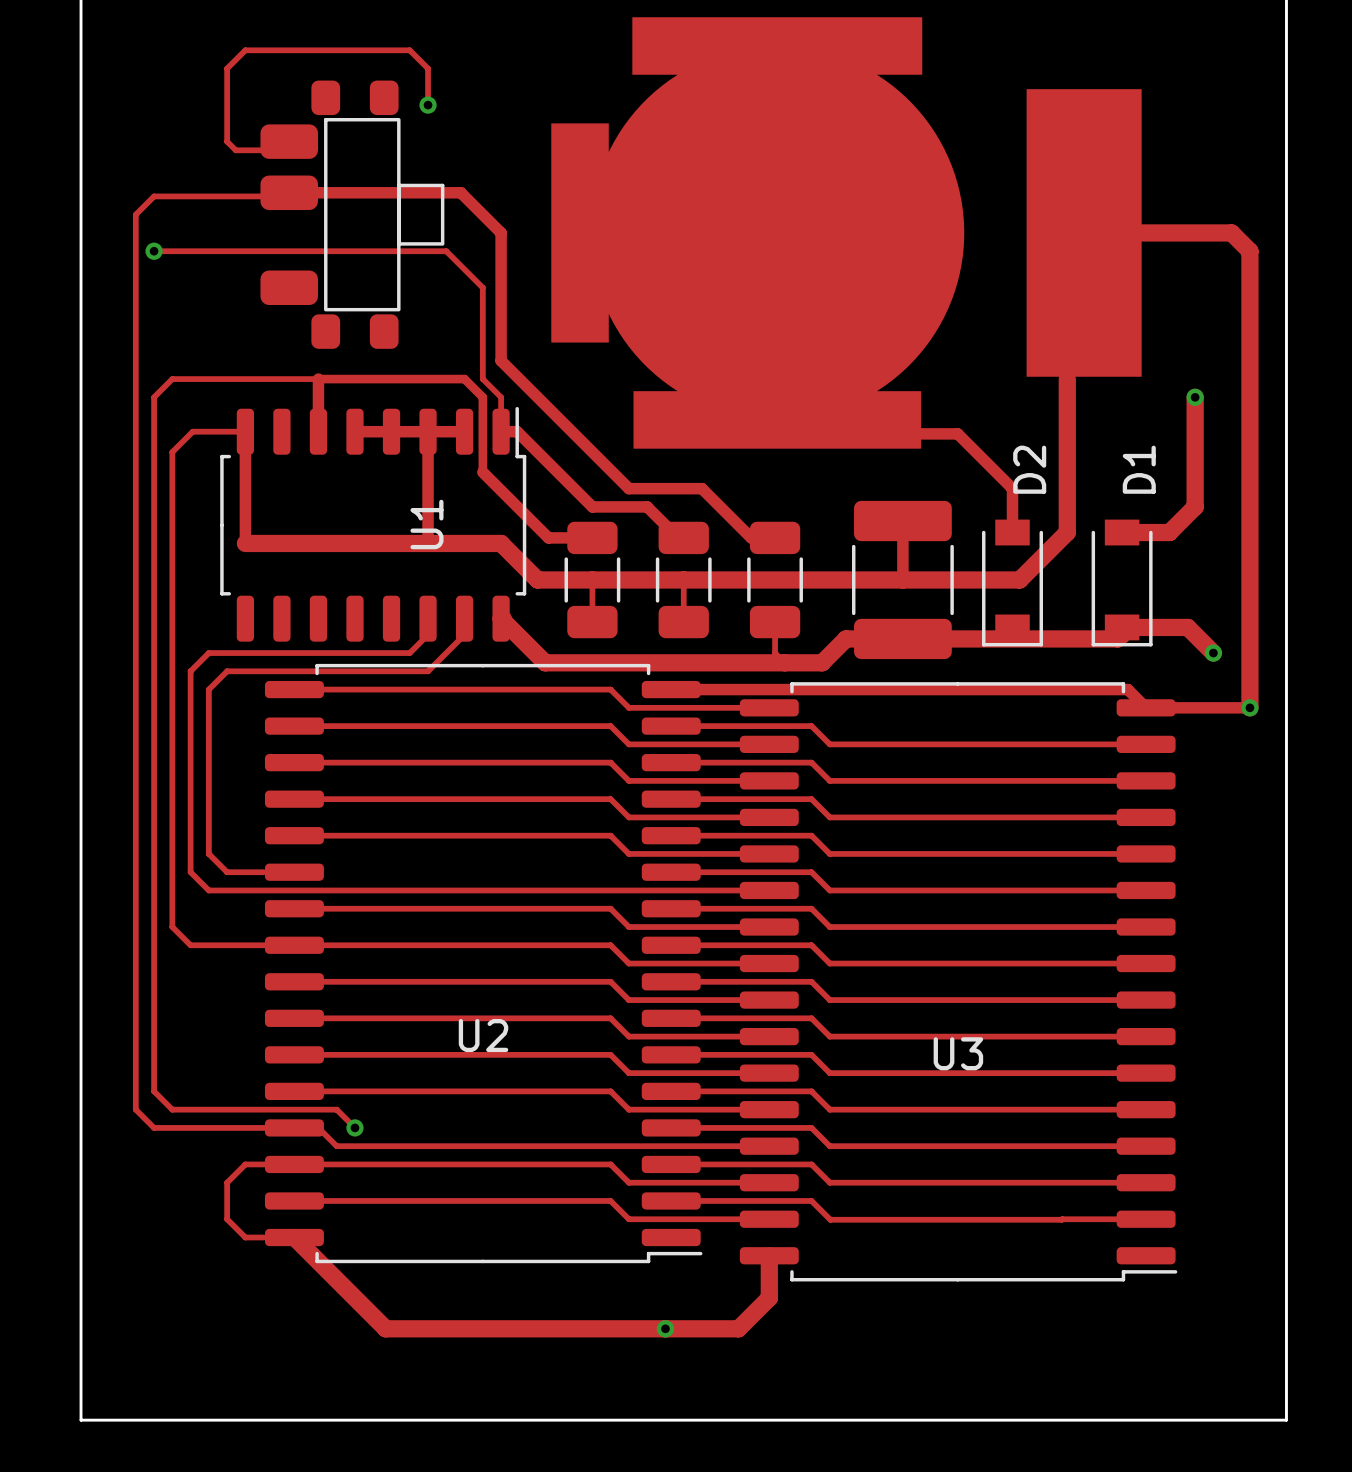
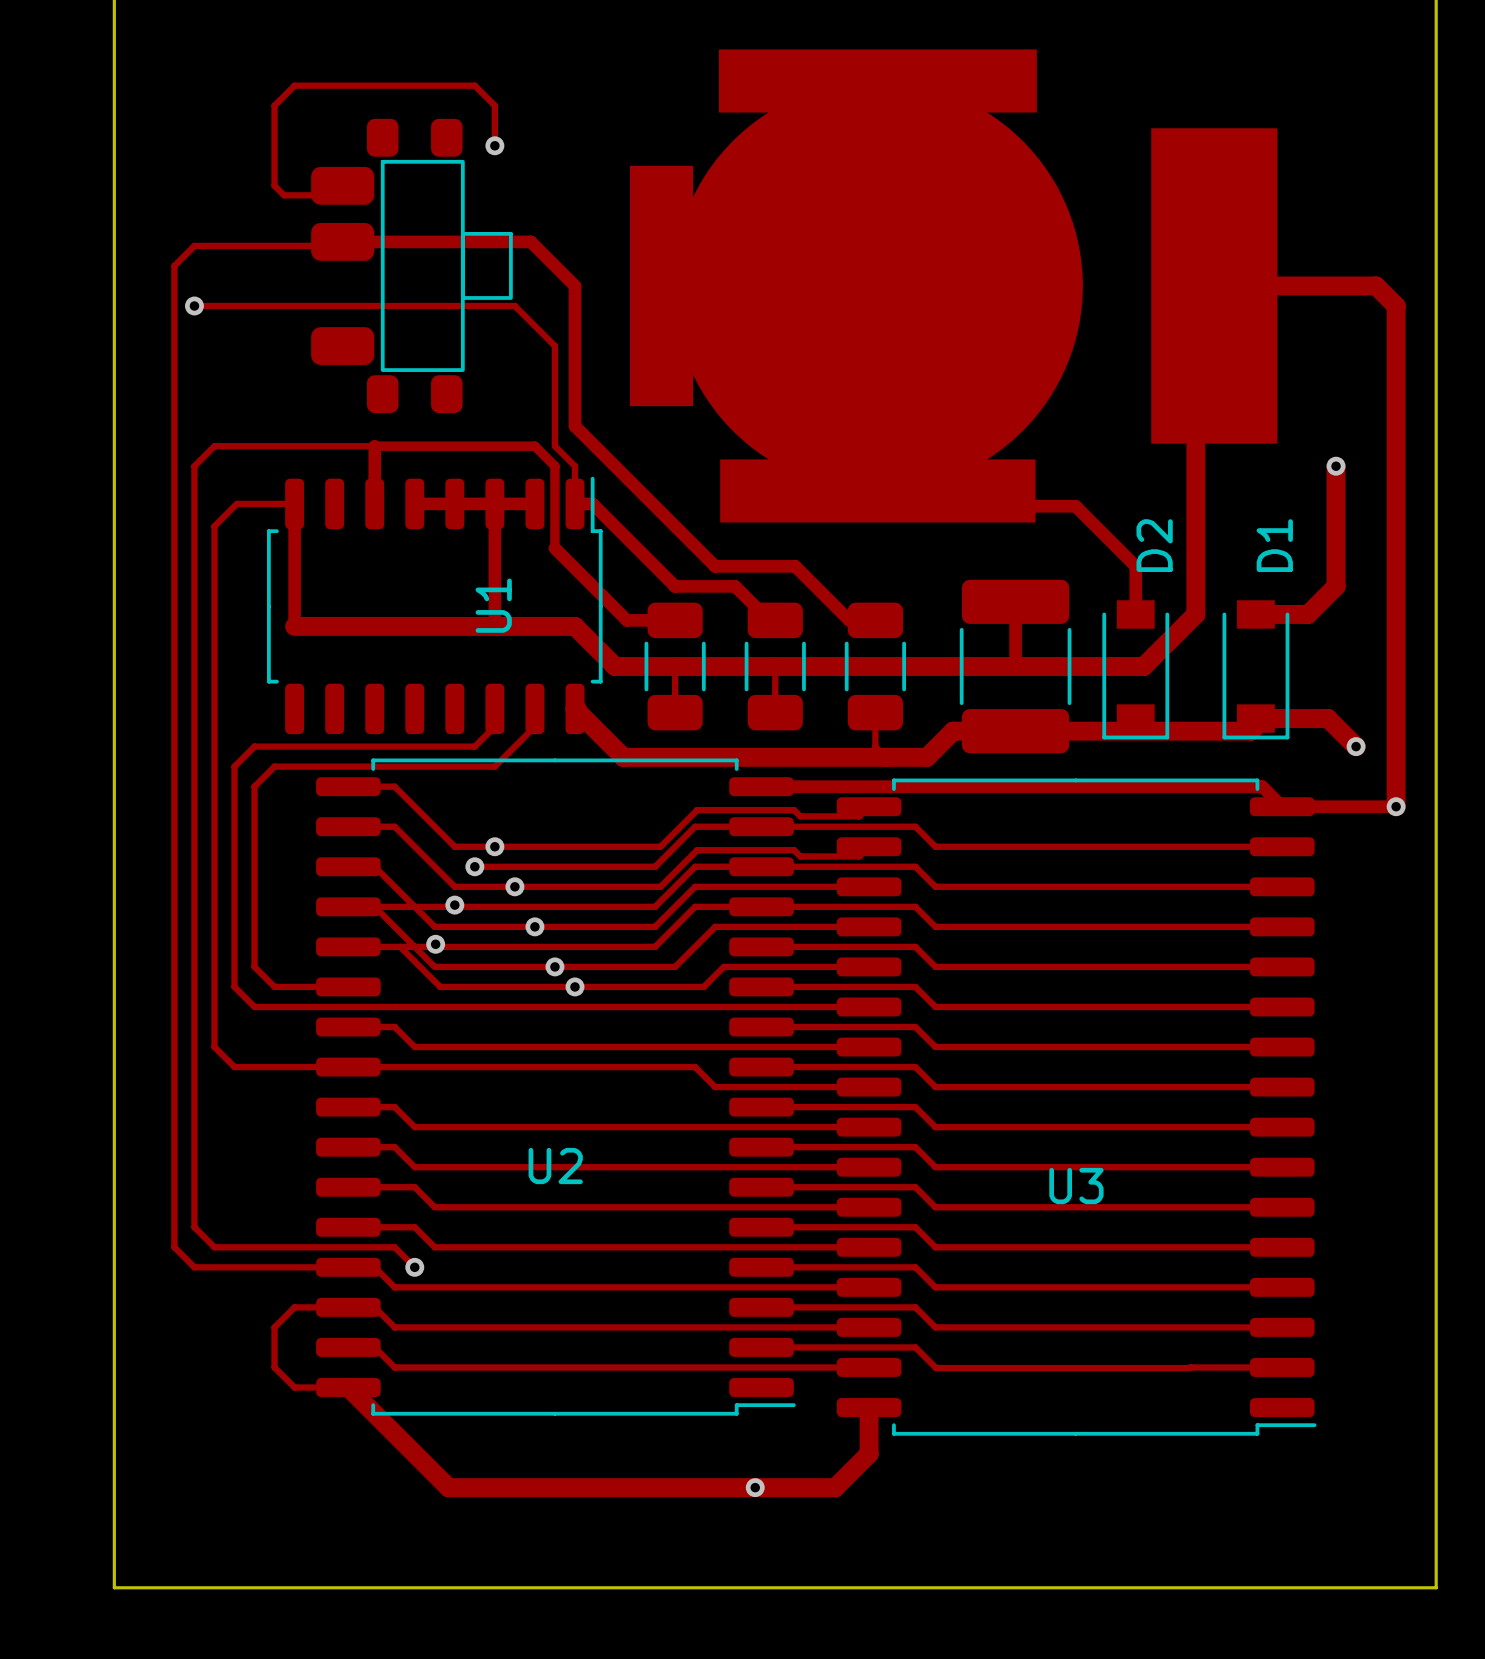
track: (336, 689) (610, 689) (628, 707) (769, 707) -> (394, 786) (454, 846) (660, 846) (697, 810) (794, 810) (800, 816) (859, 816) (869, 806)
track: (336, 726) (610, 726) (628, 744) (769, 744) -> (394, 826) (454, 886) (660, 886) (697, 850) (794, 850) (800, 856) (859, 856) (869, 846)
via: none -> (494, 846)
track: (318, 762) (409, 762) -> (374, 866) (434, 926) (655, 926) (695, 886) (715, 886)
via: none -> (474, 866)
track: (574, 762) (610, 762) (628, 780) -> (655, 866) (695, 826) (761, 826)
via: none -> (514, 886)
via: none -> (454, 905)
track: none -> (374, 906) (434, 966) (675, 966) (715, 926)
track: (574, 799) (610, 799) (628, 817) -> (655, 906) (695, 866) (761, 866)
via: none -> (534, 926)
via: none -> (435, 944)
track: none -> (400, 946) (440, 986) (703, 986) (723, 966)
track: (574, 835) (610, 835) (628, 853) (636, 853) -> (655, 946) (695, 906) (761, 906)
via: none -> (554, 966)
via: none -> (574, 986)
track: (336, 908) (610, 908) (628, 927) -> (394, 1026) (414, 1047) (715, 1047)
track: (336, 981) (610, 981) (628, 1000) -> (394, 1107) (414, 1127) (715, 1127)
track: (336, 1018) (610, 1018) (628, 1036) -> (394, 1147) (414, 1167) (715, 1167)
track: (354, 1054) (610, 1054) (628, 1073) -> (414, 1187) (434, 1207) (715, 1207)
track: (354, 1091) (610, 1091) (628, 1109) -> (414, 1227) (434, 1247) (715, 1247)
track: (318, 1164) (610, 1164) (628, 1182) -> (374, 1307) (394, 1327) (715, 1327)
track: (318, 1200) (610, 1200) (628, 1219) -> (374, 1347) (394, 1367) (715, 1367)

